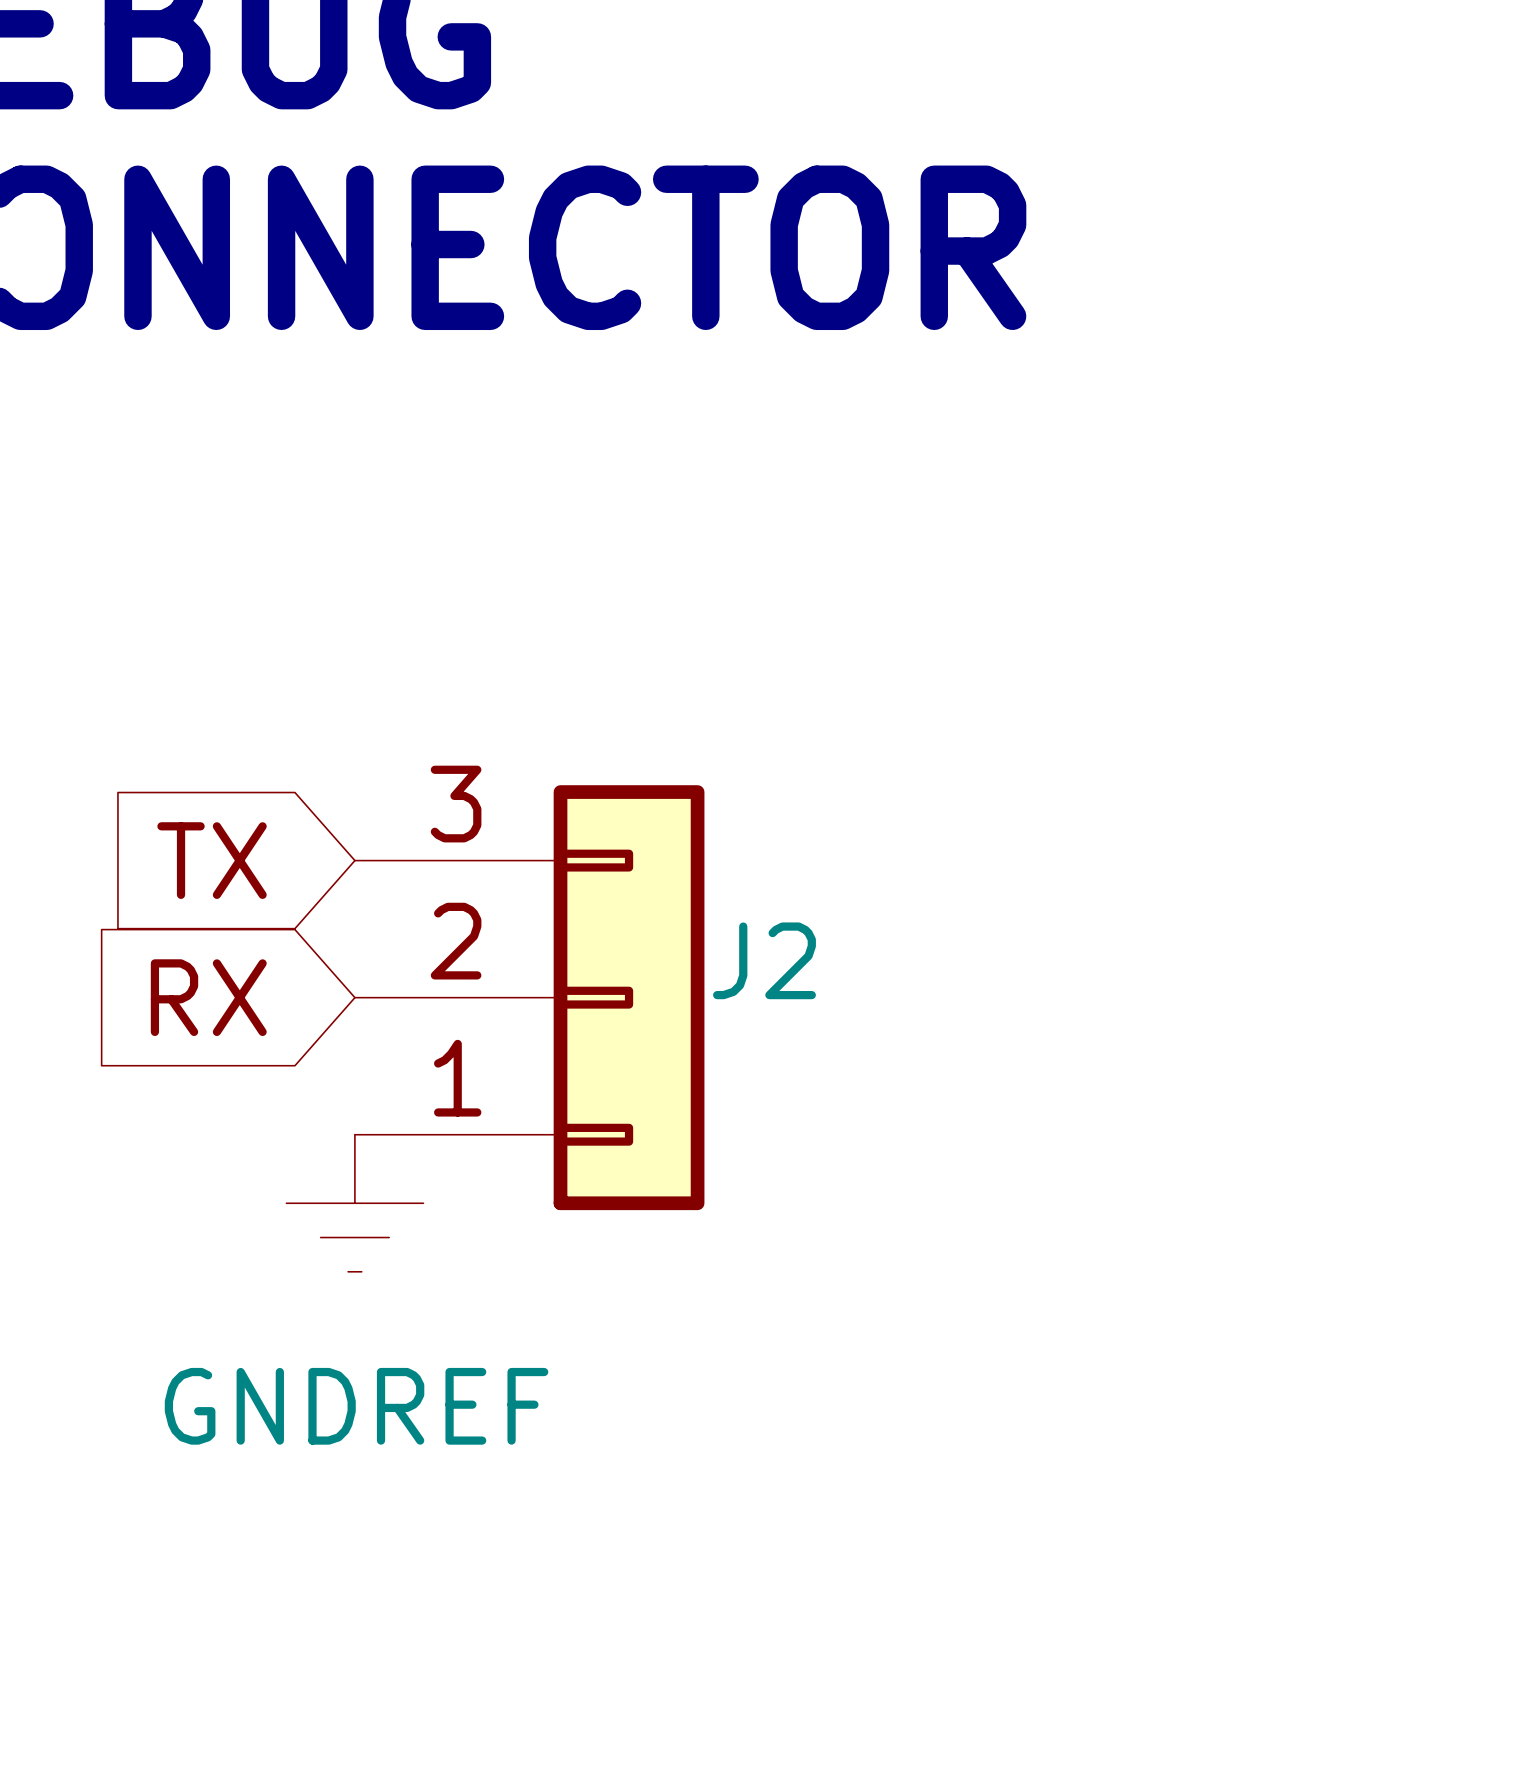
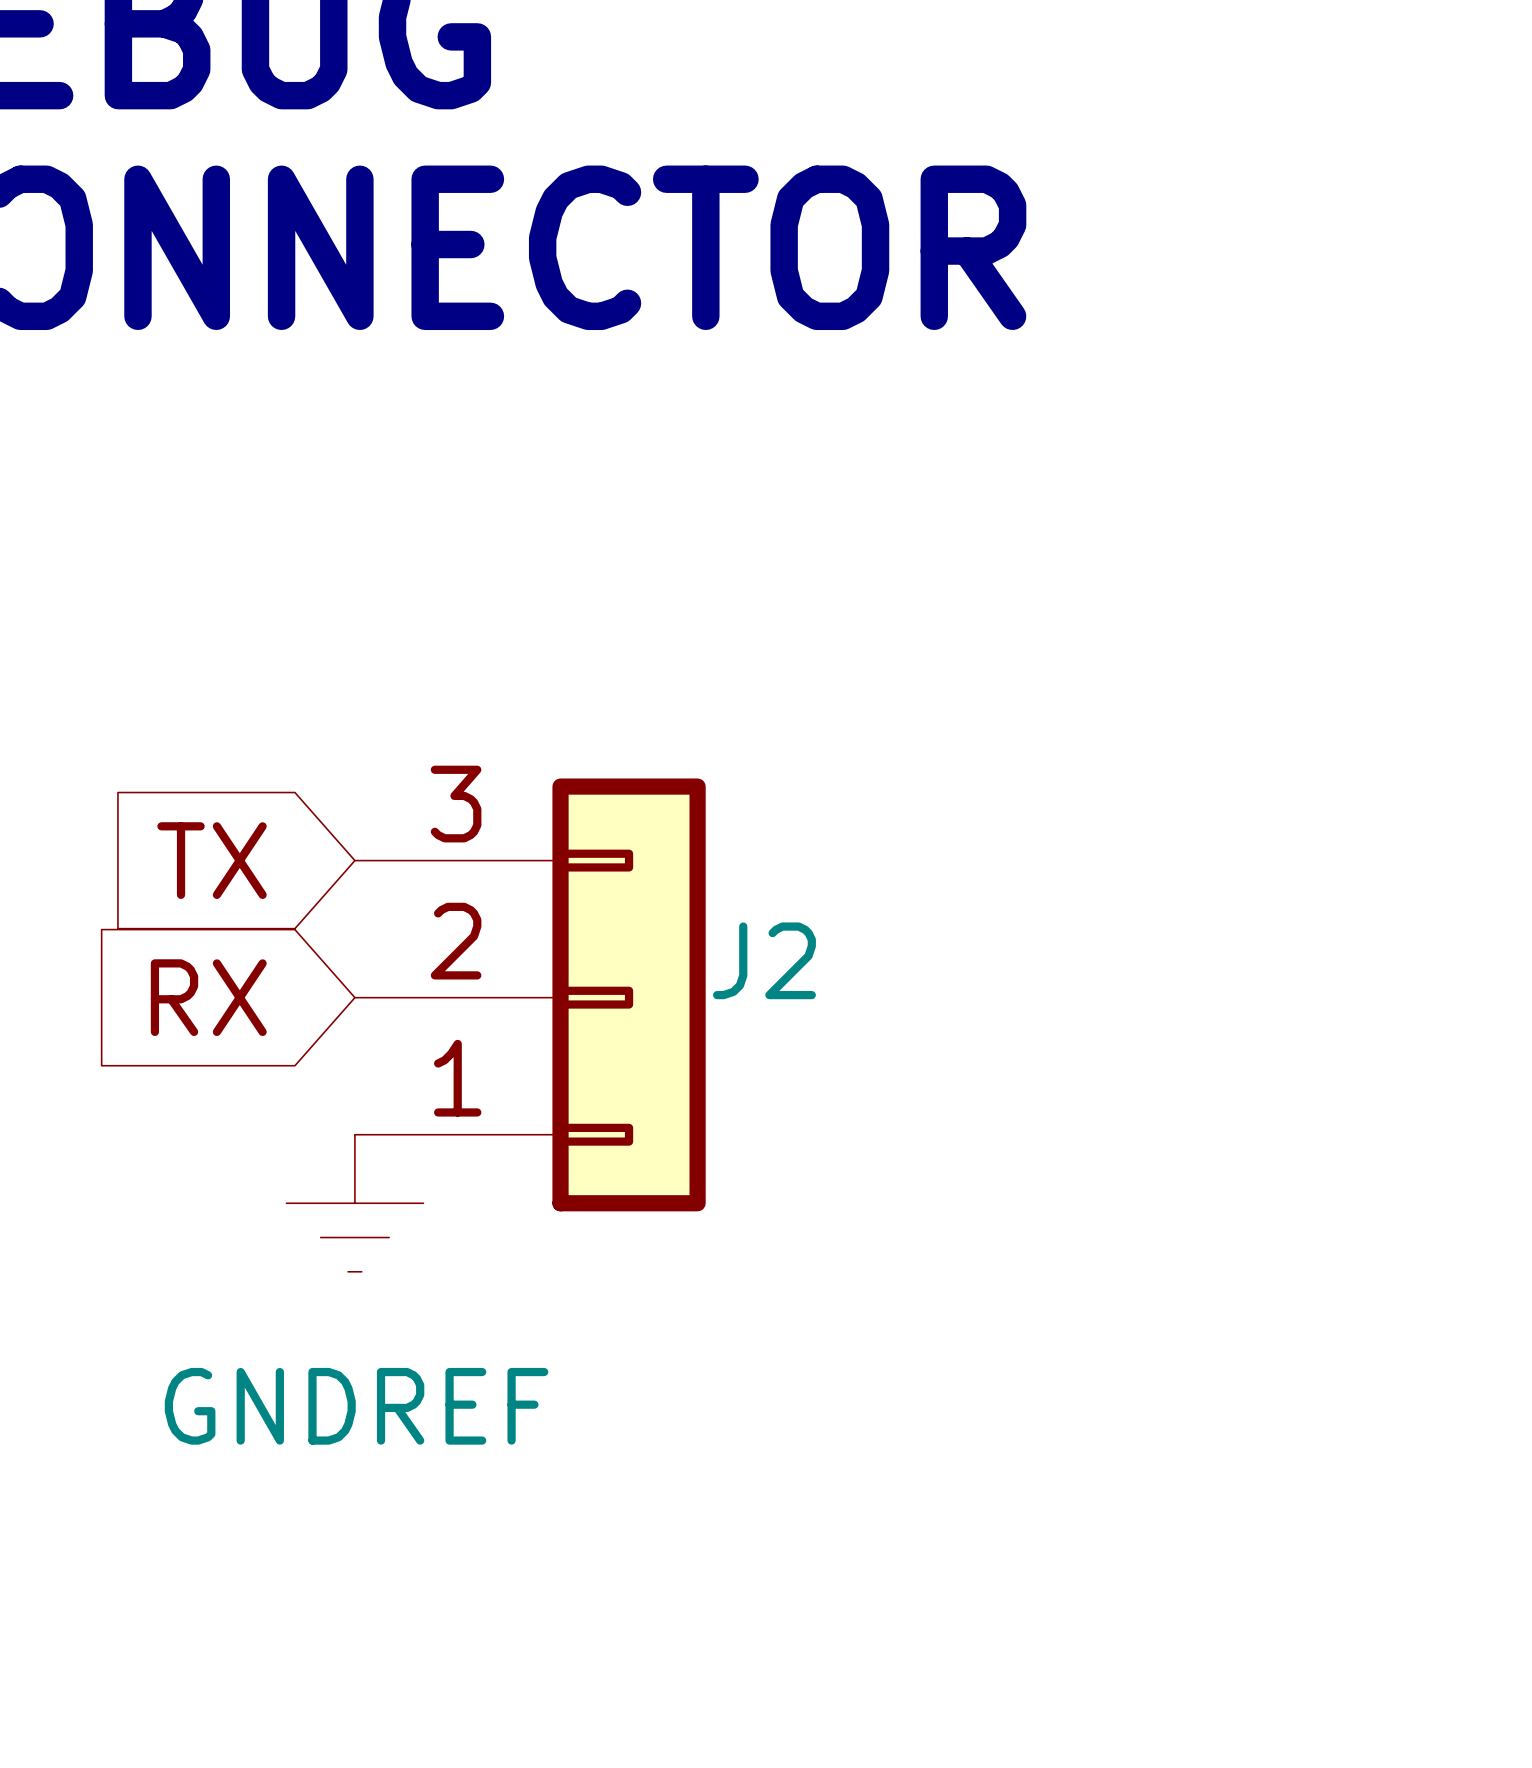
J2 symbol: [354, 785, 705, 1211] -> [354, 778, 706, 1212]

